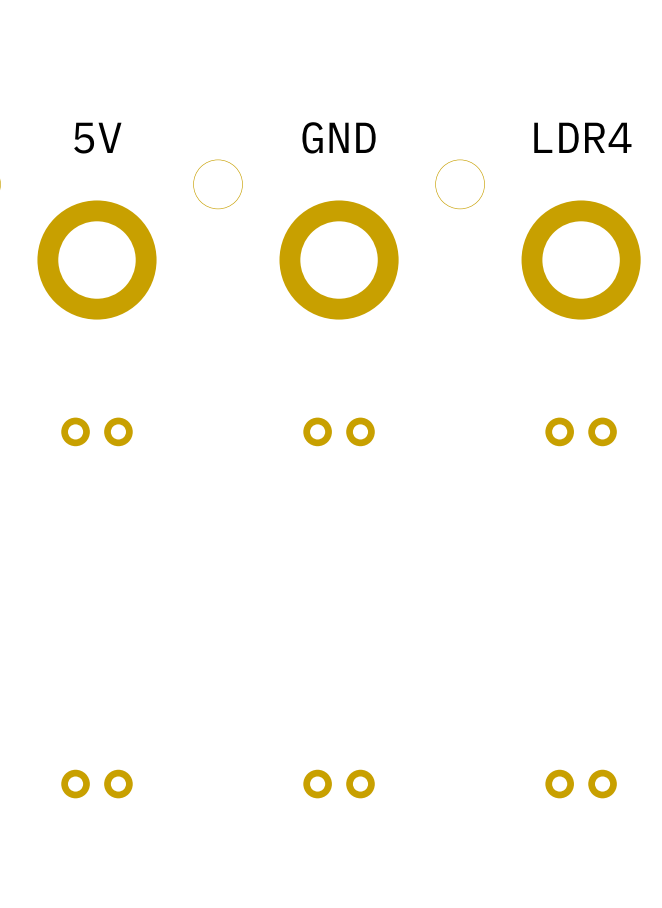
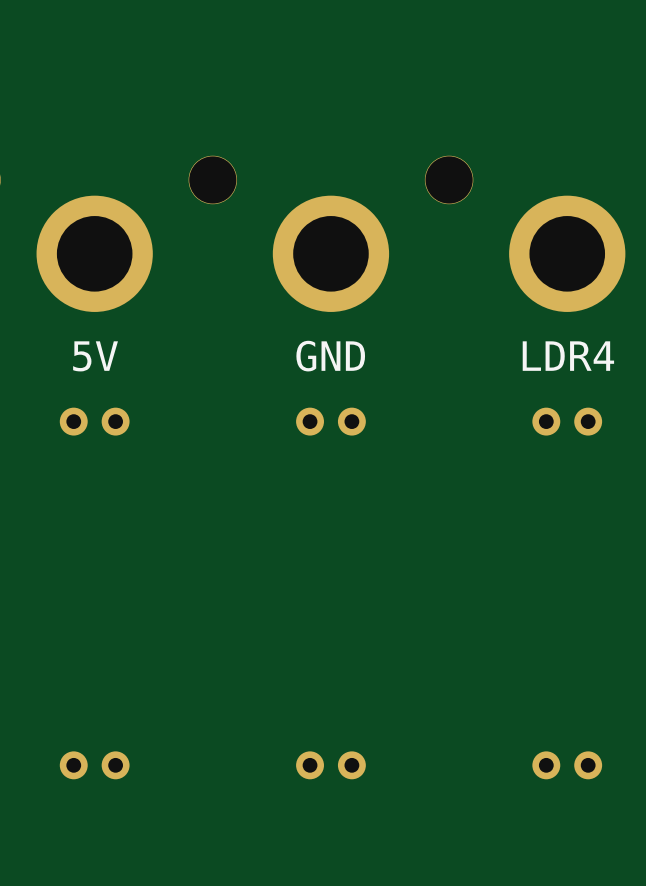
text position: GND (339, 137) -> GND (330, 356)
text position: LDR4 (582, 137) -> LDR4 (568, 356)
text position: 5V (97, 138) -> 5V (95, 356)

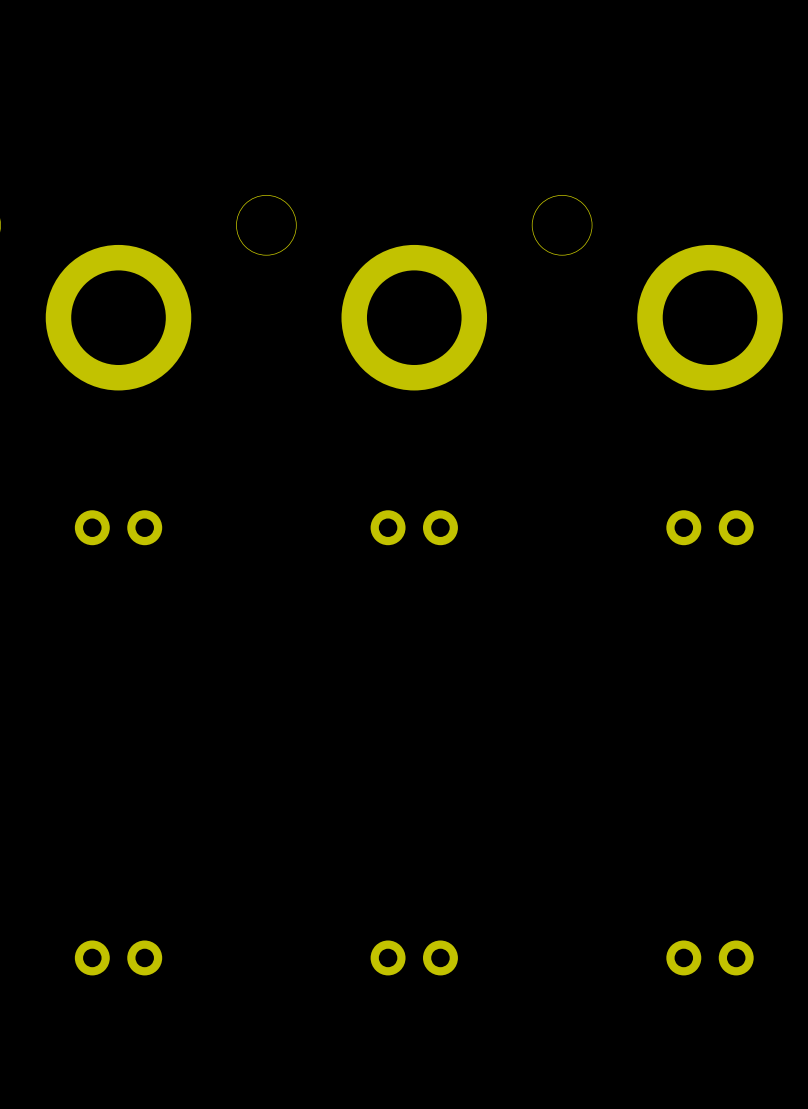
text: 5V (95, 356) -> none
text: GND (330, 356) -> none
text: LDR4 (568, 356) -> none

